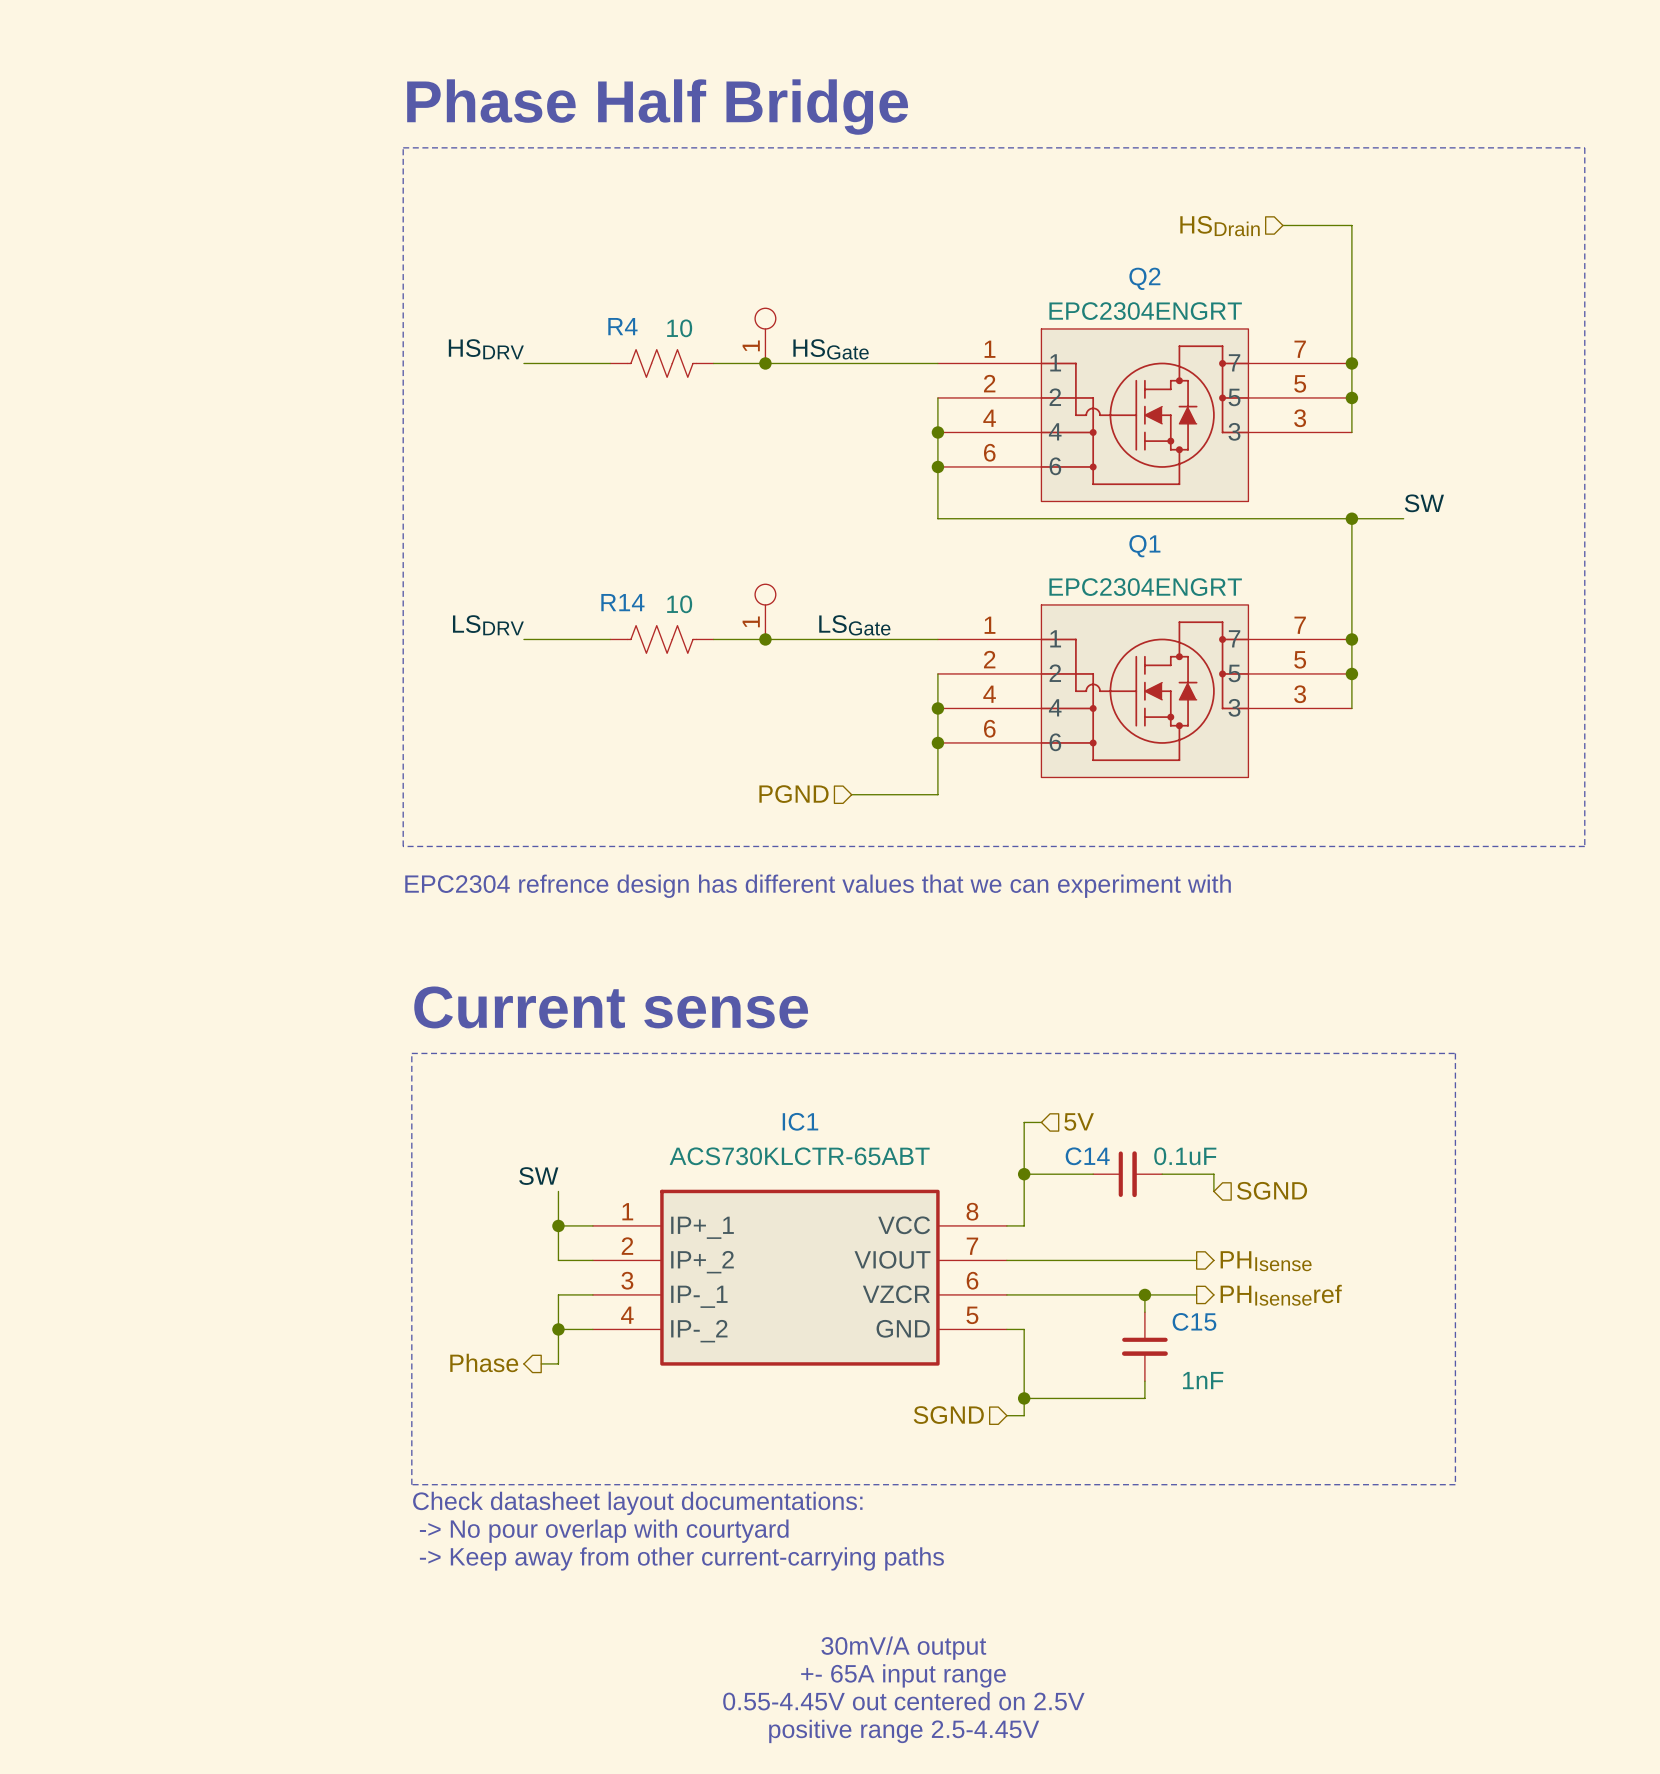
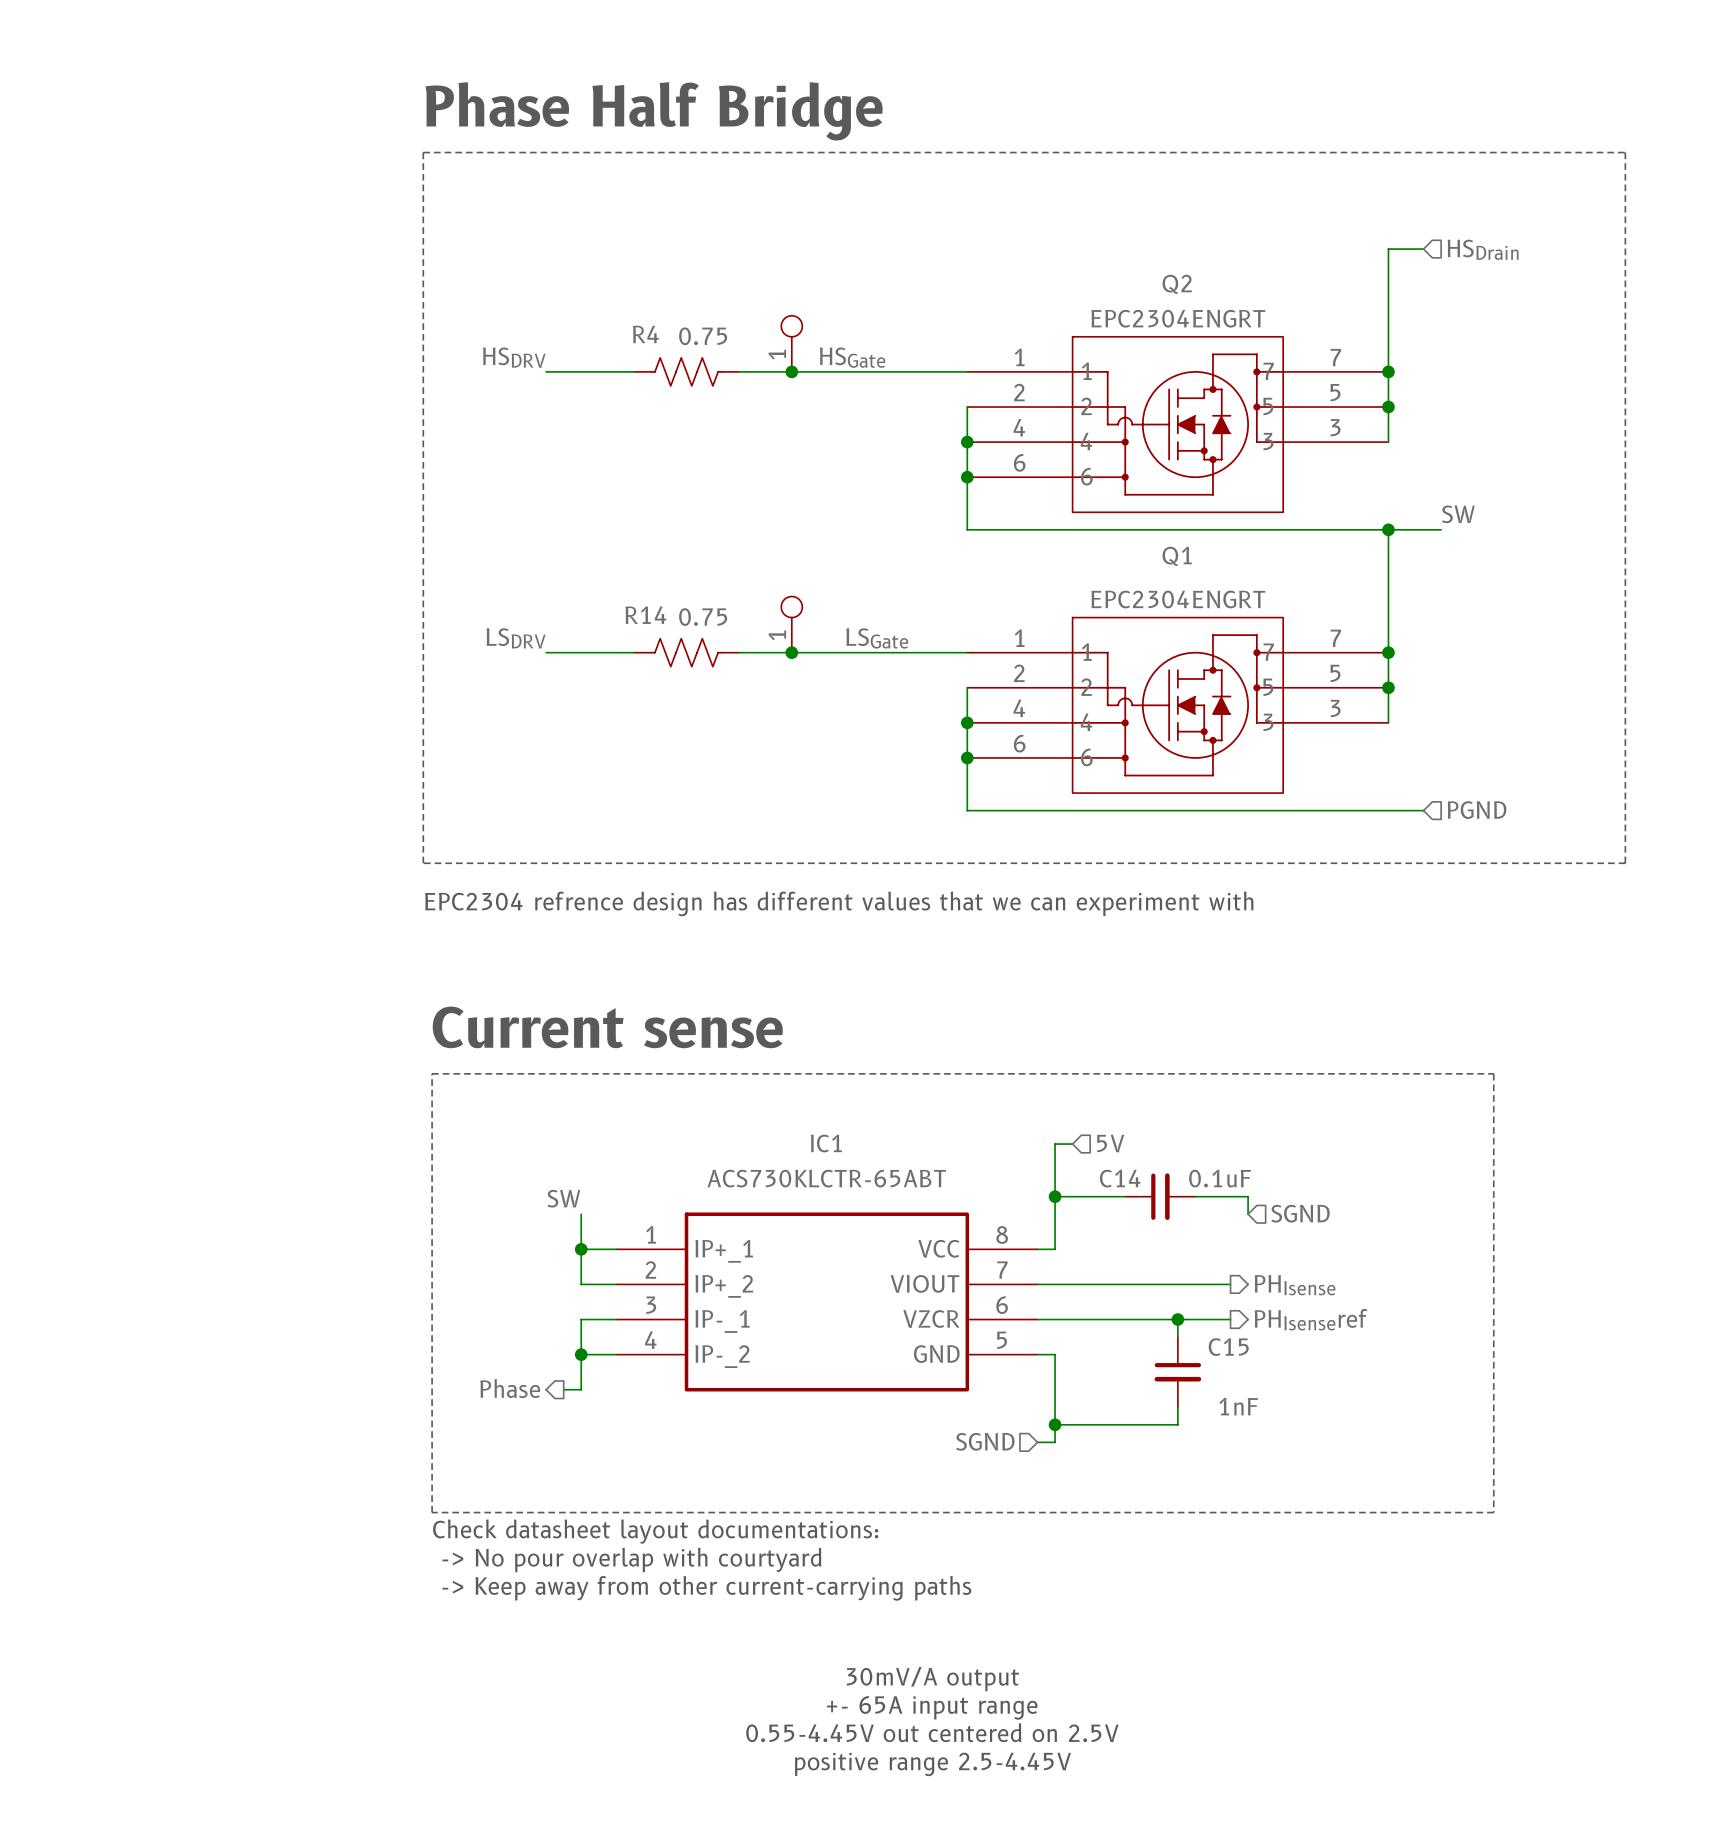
wire: (1282, 225) (1351, 225) (1351, 242) -> (1423, 249) (1388, 249)
hierarchical label rotation: 0° (1220, 226) -> 180° (1483, 249)
hierarchical label position: HSDrain (1220, 226) -> HSDrain (1483, 249)
R4 value: 10 (679, 328) -> 0.75 (703, 336)
R14 value: 10 (679, 604) -> 0.75 (703, 617)
hierarchical label: PGND (793, 794) -> none
wire: (851, 794) (937, 794) -> (1423, 810) (967, 810)
hierarchical label: none -> PGND (1477, 810)

